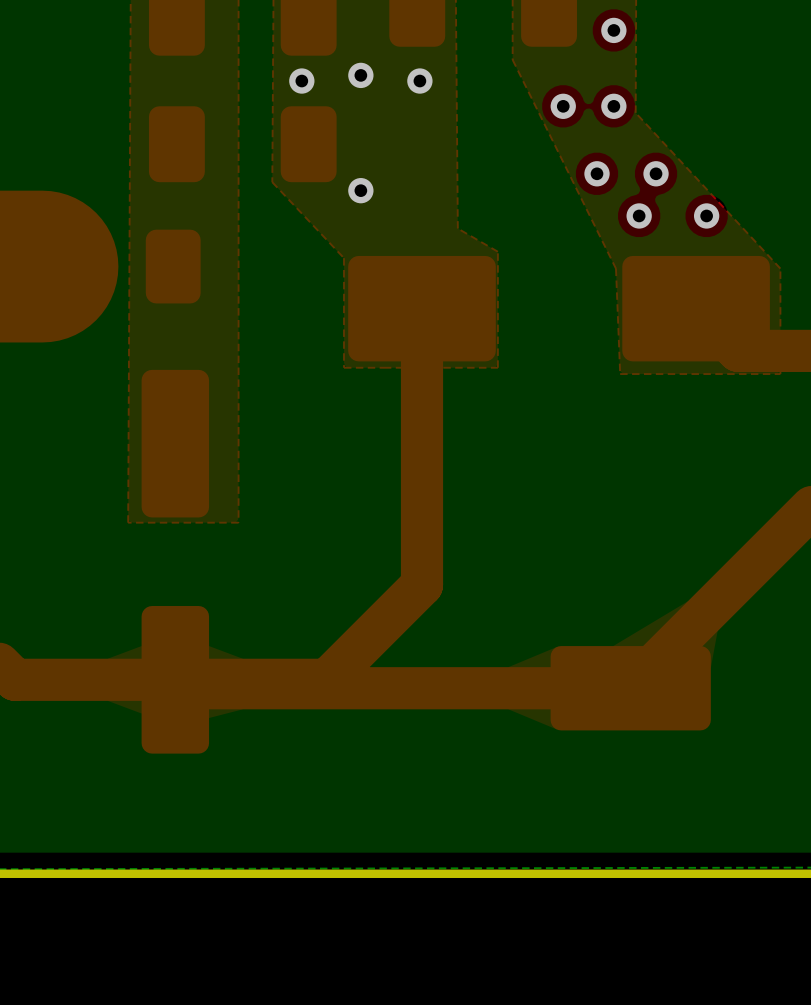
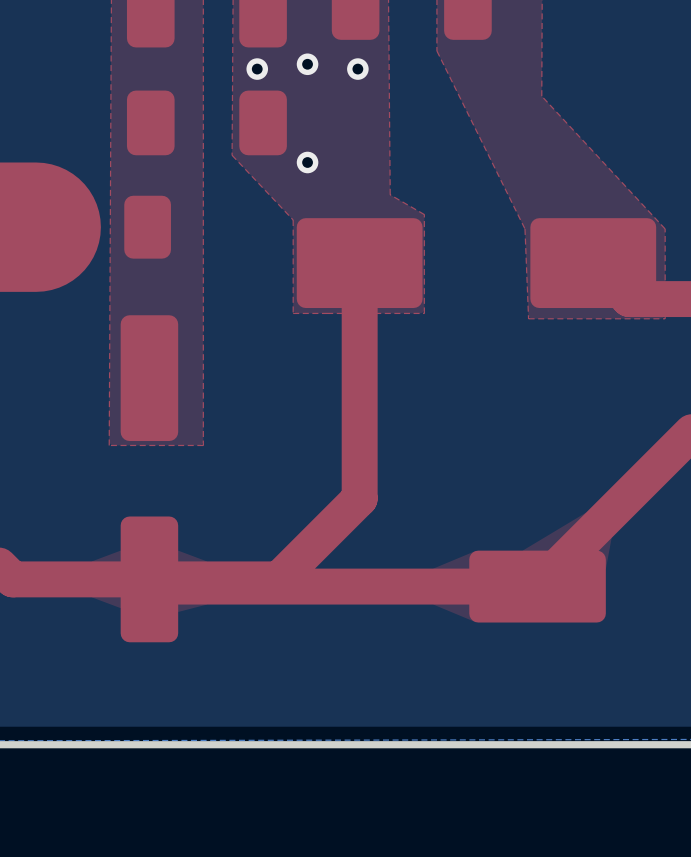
via: (613, 30) -> none
via: (563, 106) -> none
via: (613, 106) -> none
via: (596, 173) -> none
via: (656, 173) -> none
via: (639, 215) -> none
via: (706, 215) -> none

